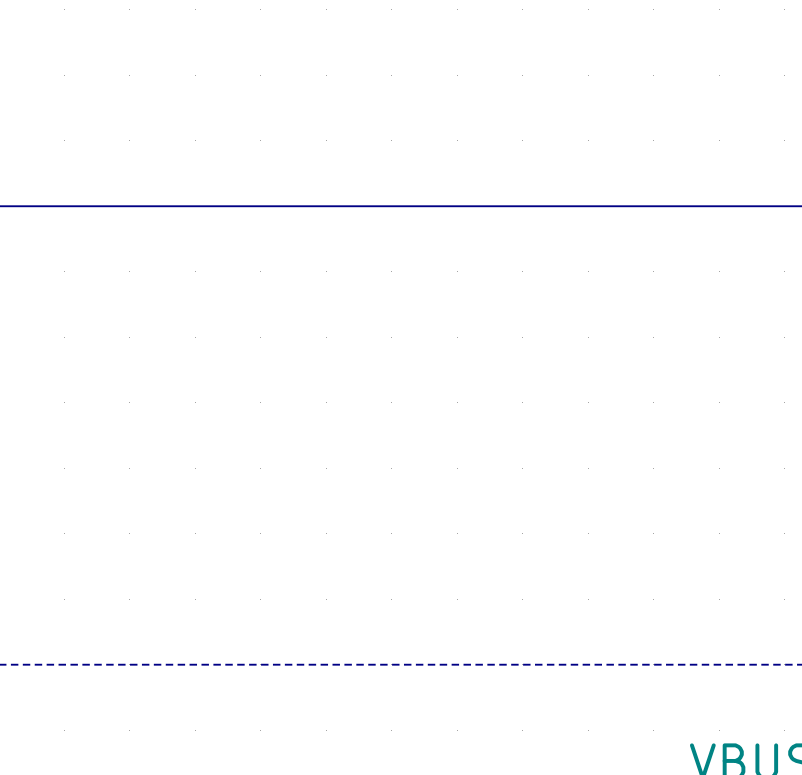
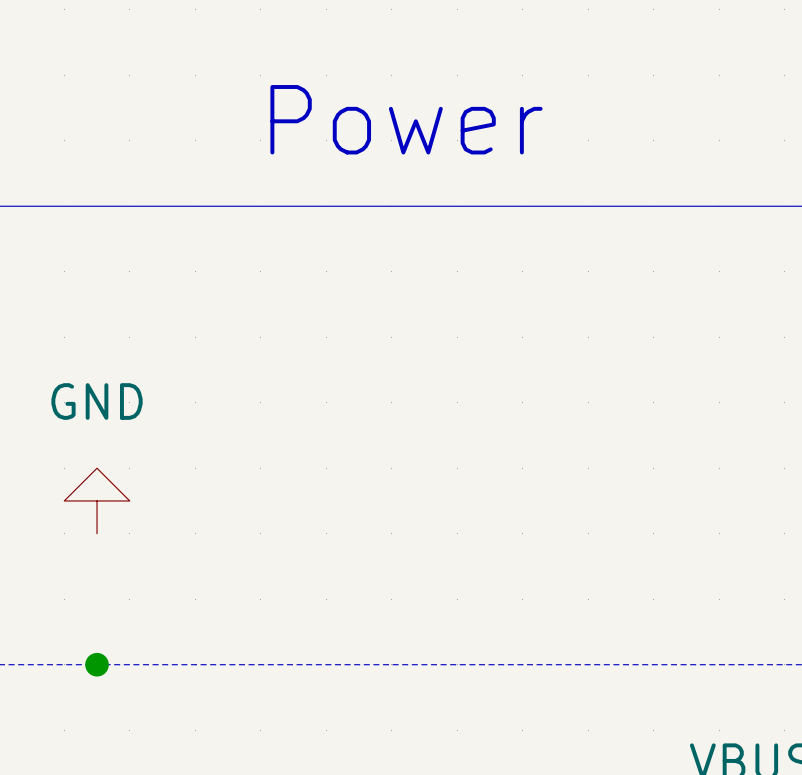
text: none -> Power (406, 119)
power symbol: none -> GND (97, 500)
junction: none -> (97, 664)

